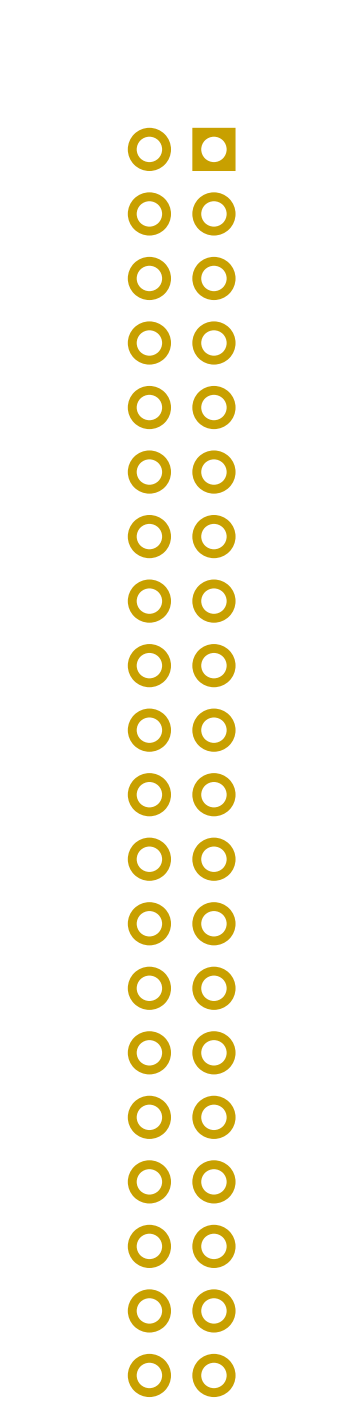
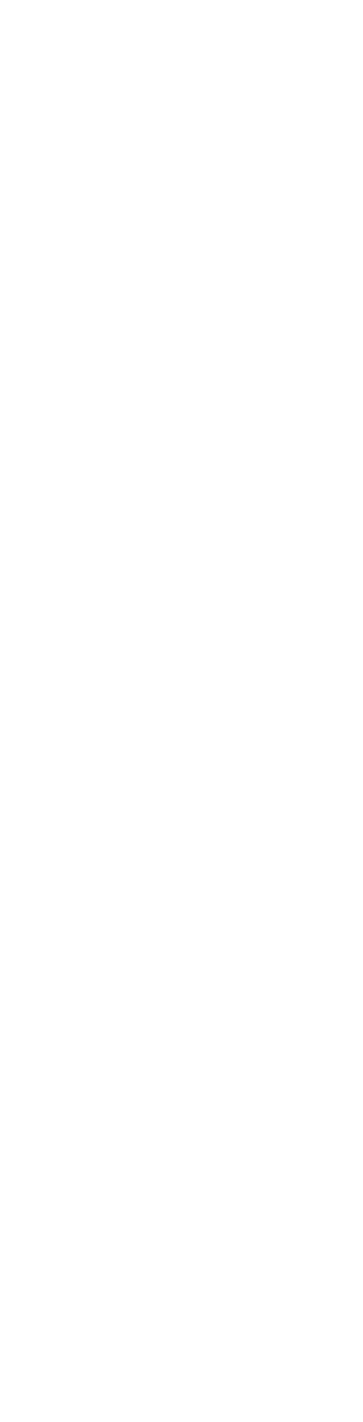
part: (181, 762) -> none

